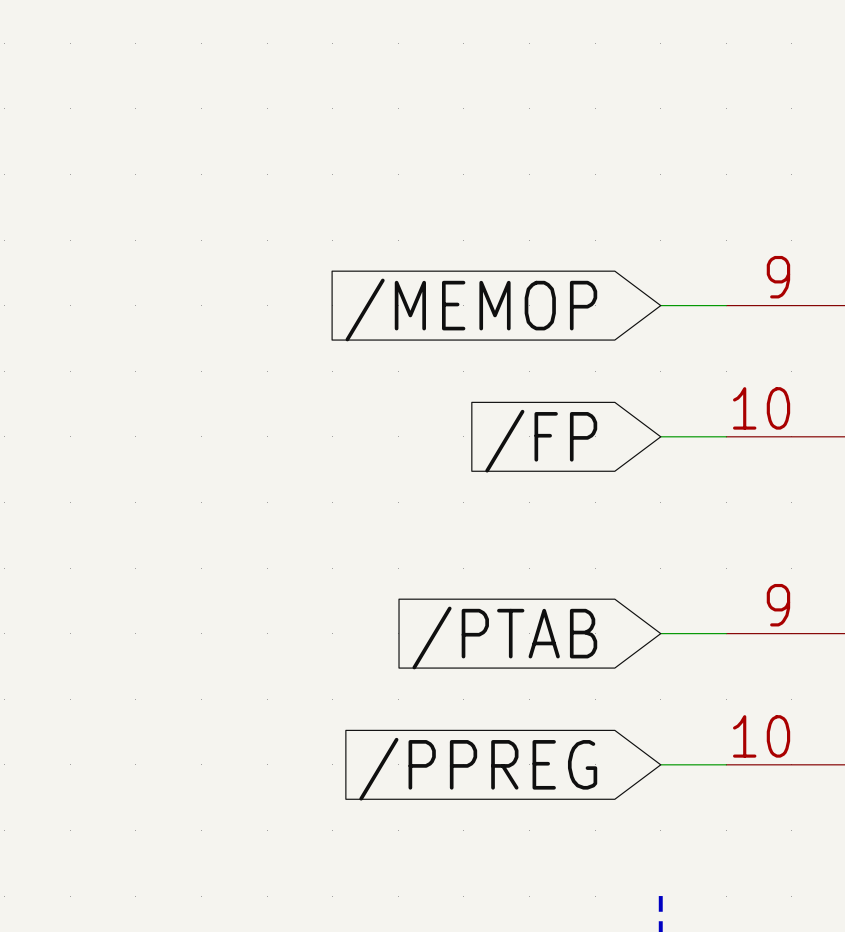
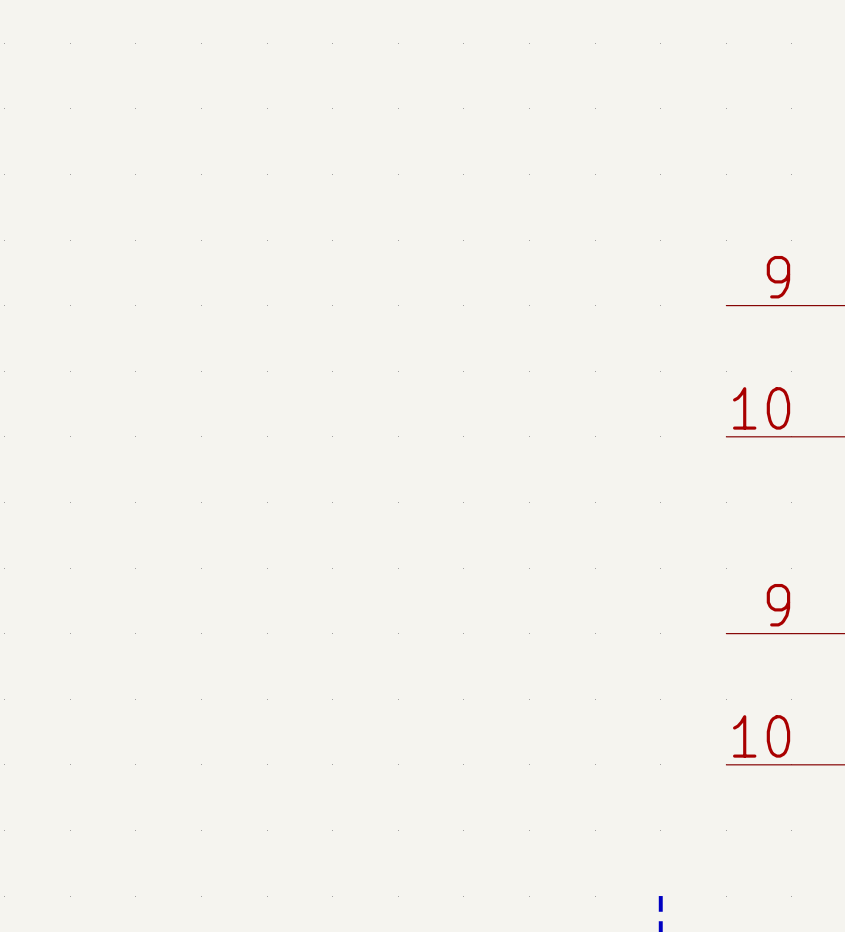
wire: (660, 305) (726, 305) -> none
global label: /MEMOP (471, 309) -> none
wire: (660, 436) (726, 436) -> none
global label: /FP (541, 441) -> none
wire: (660, 633) (726, 633) -> none
global label: /PTAB (504, 637) -> none
wire: (660, 764) (726, 764) -> none
global label: /PPREG (478, 769) -> none

